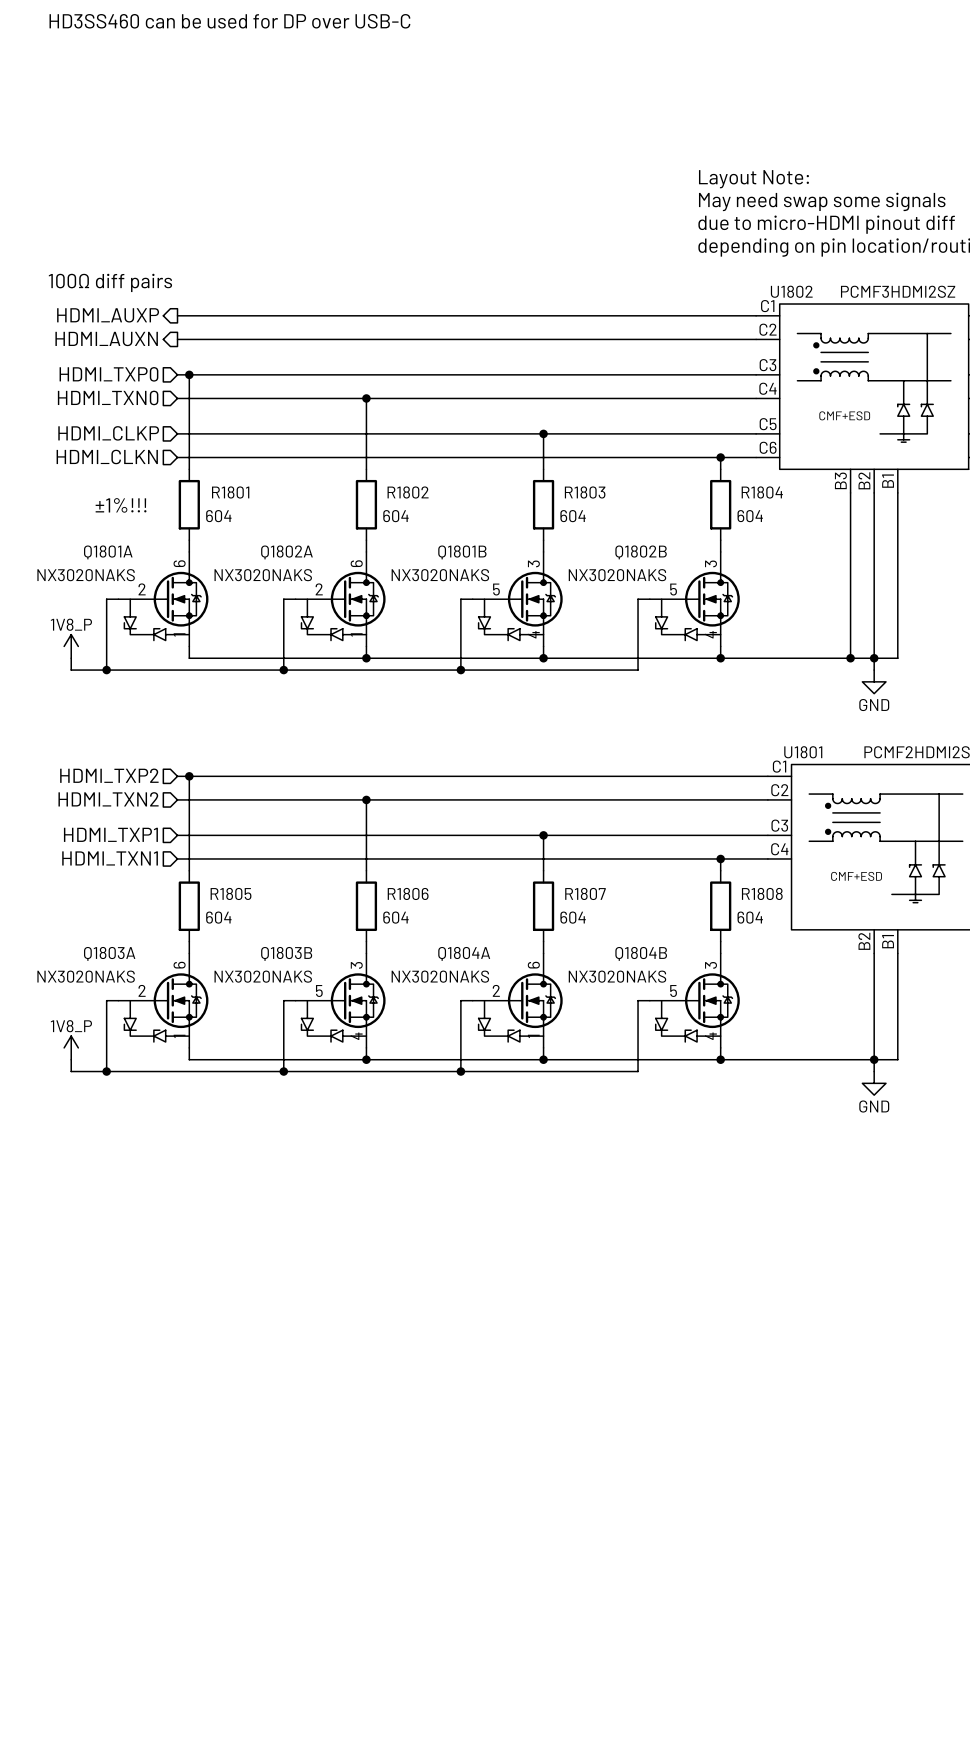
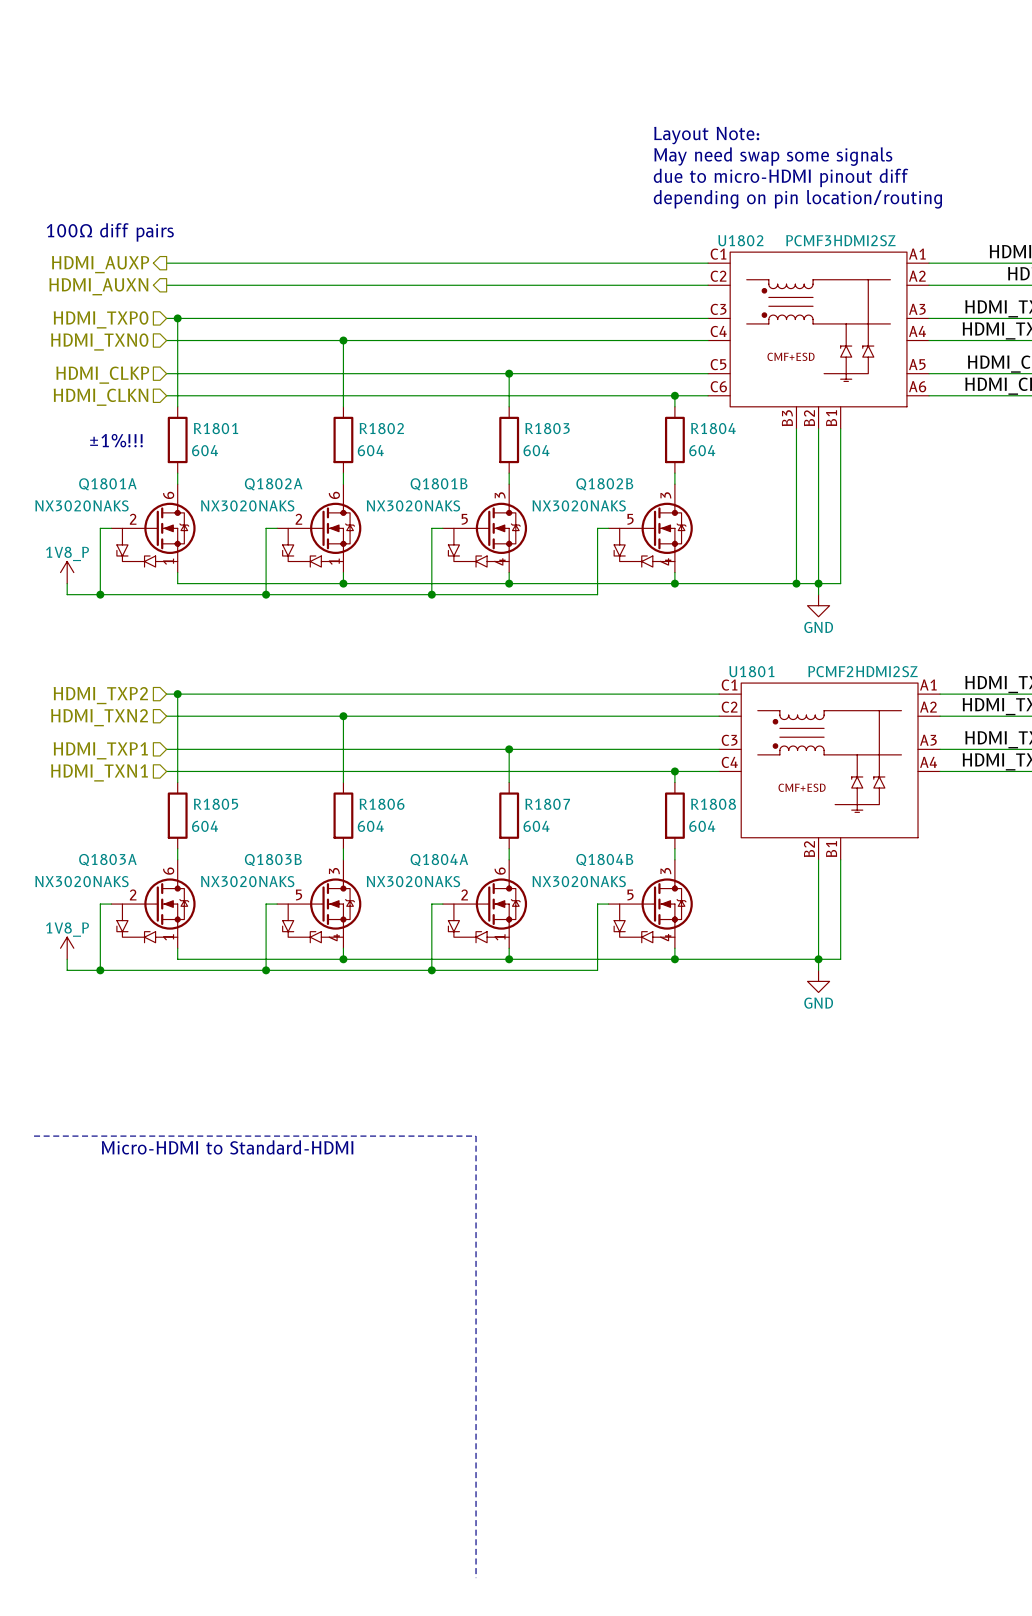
line: none -> (34, 1136) (476, 1136) (476, 1578)
text: none -> Micro-HDMI to Standard-HDMI (227, 1147)

